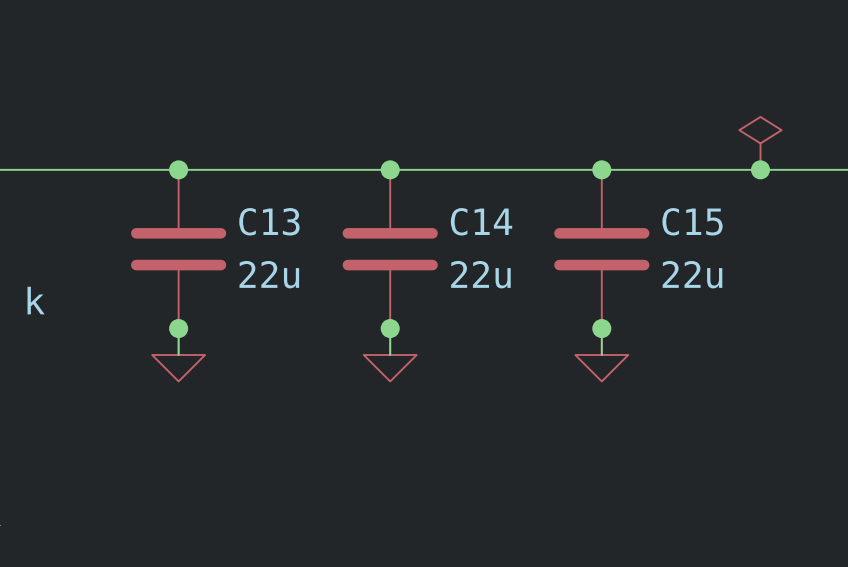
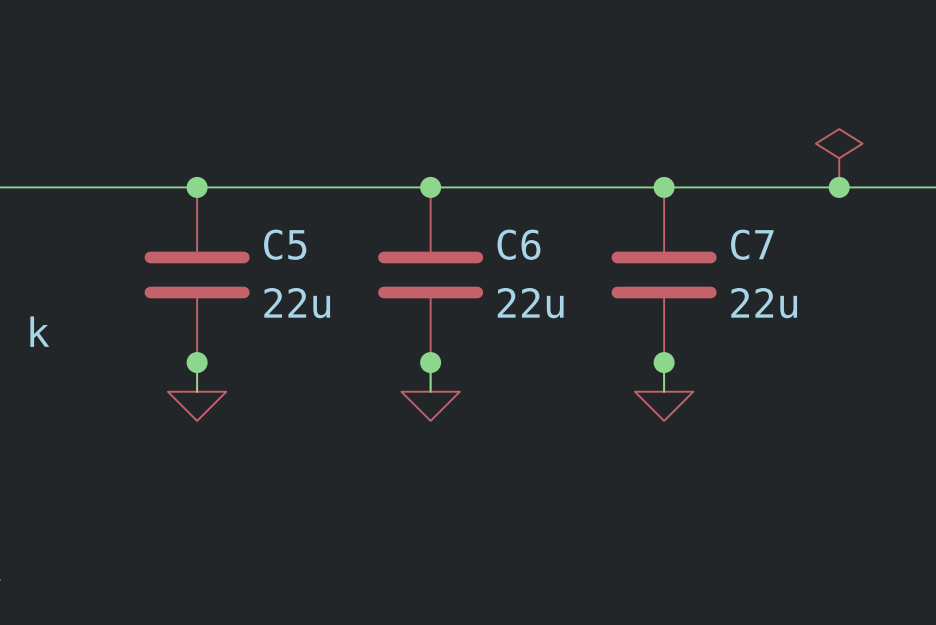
C13 name: C13 (269, 221) -> C5 (285, 244)
C14 name: C14 (481, 221) -> C6 (518, 244)
C15 name: C15 (692, 221) -> C7 (752, 244)

